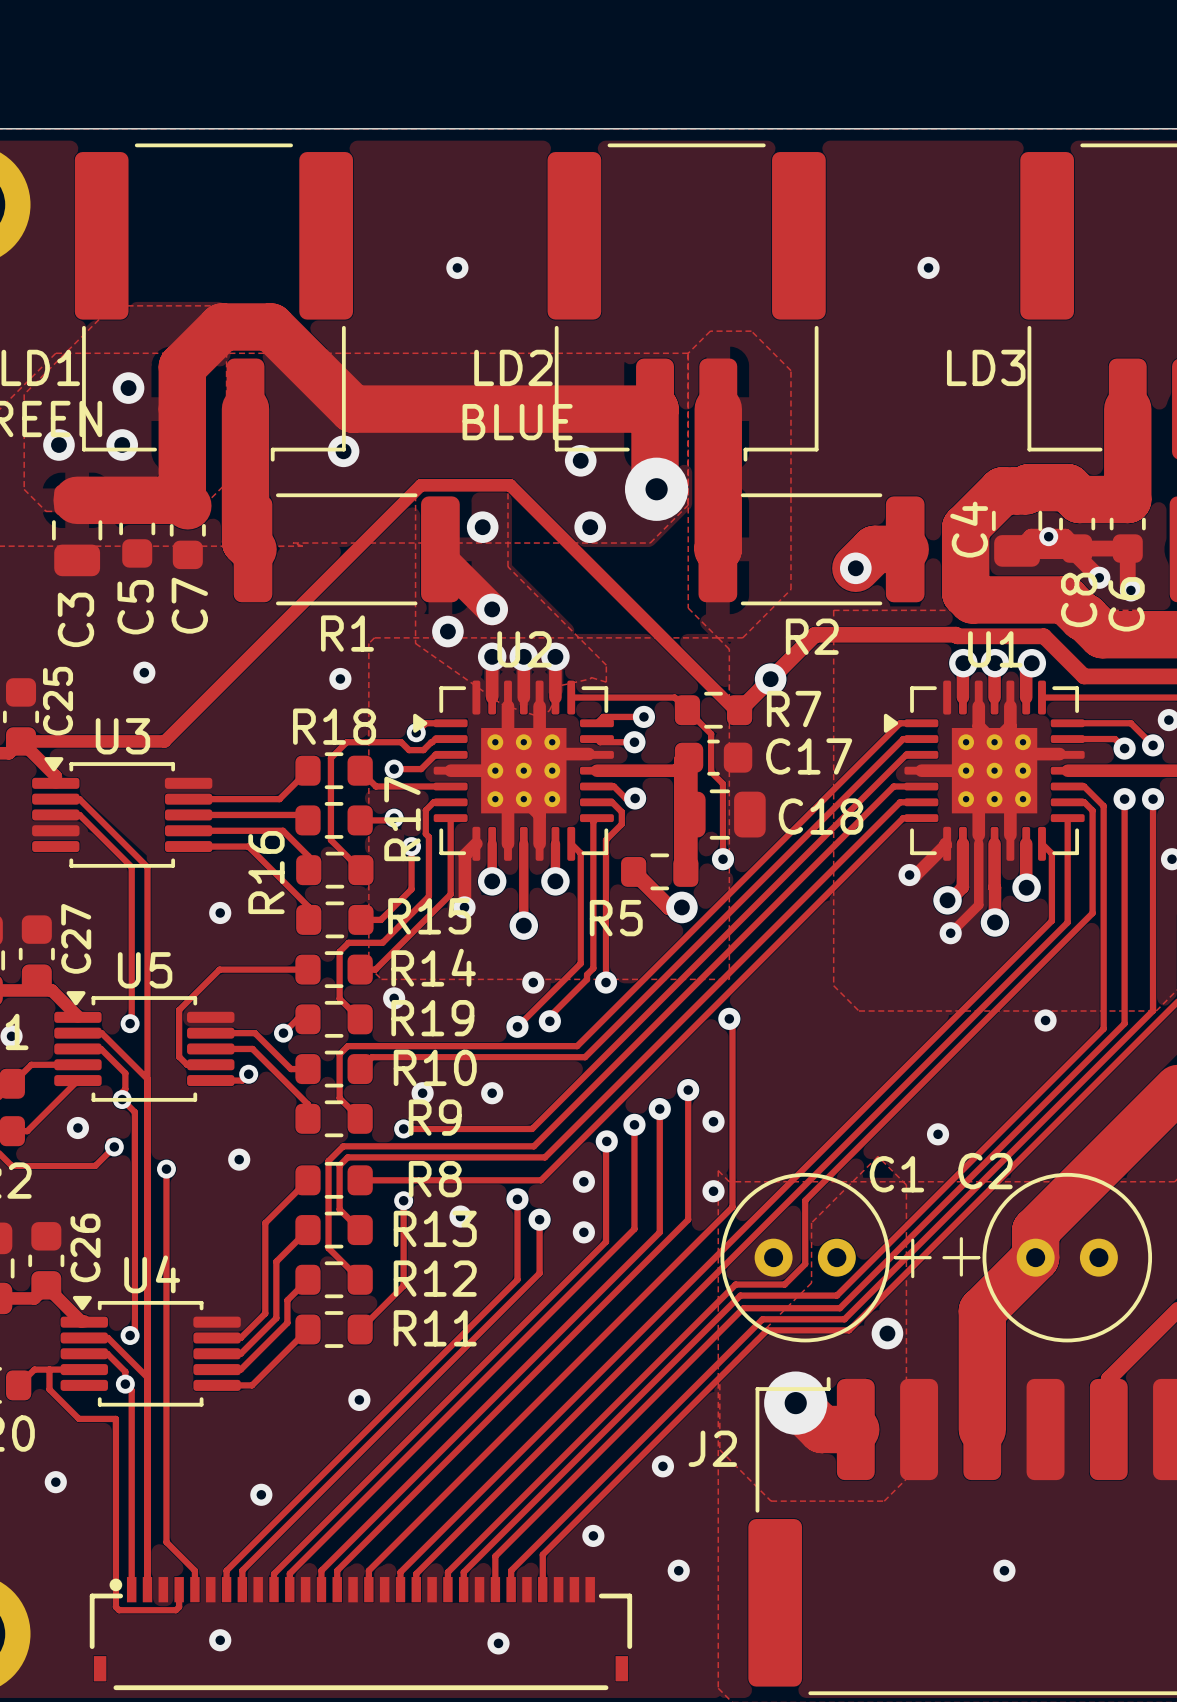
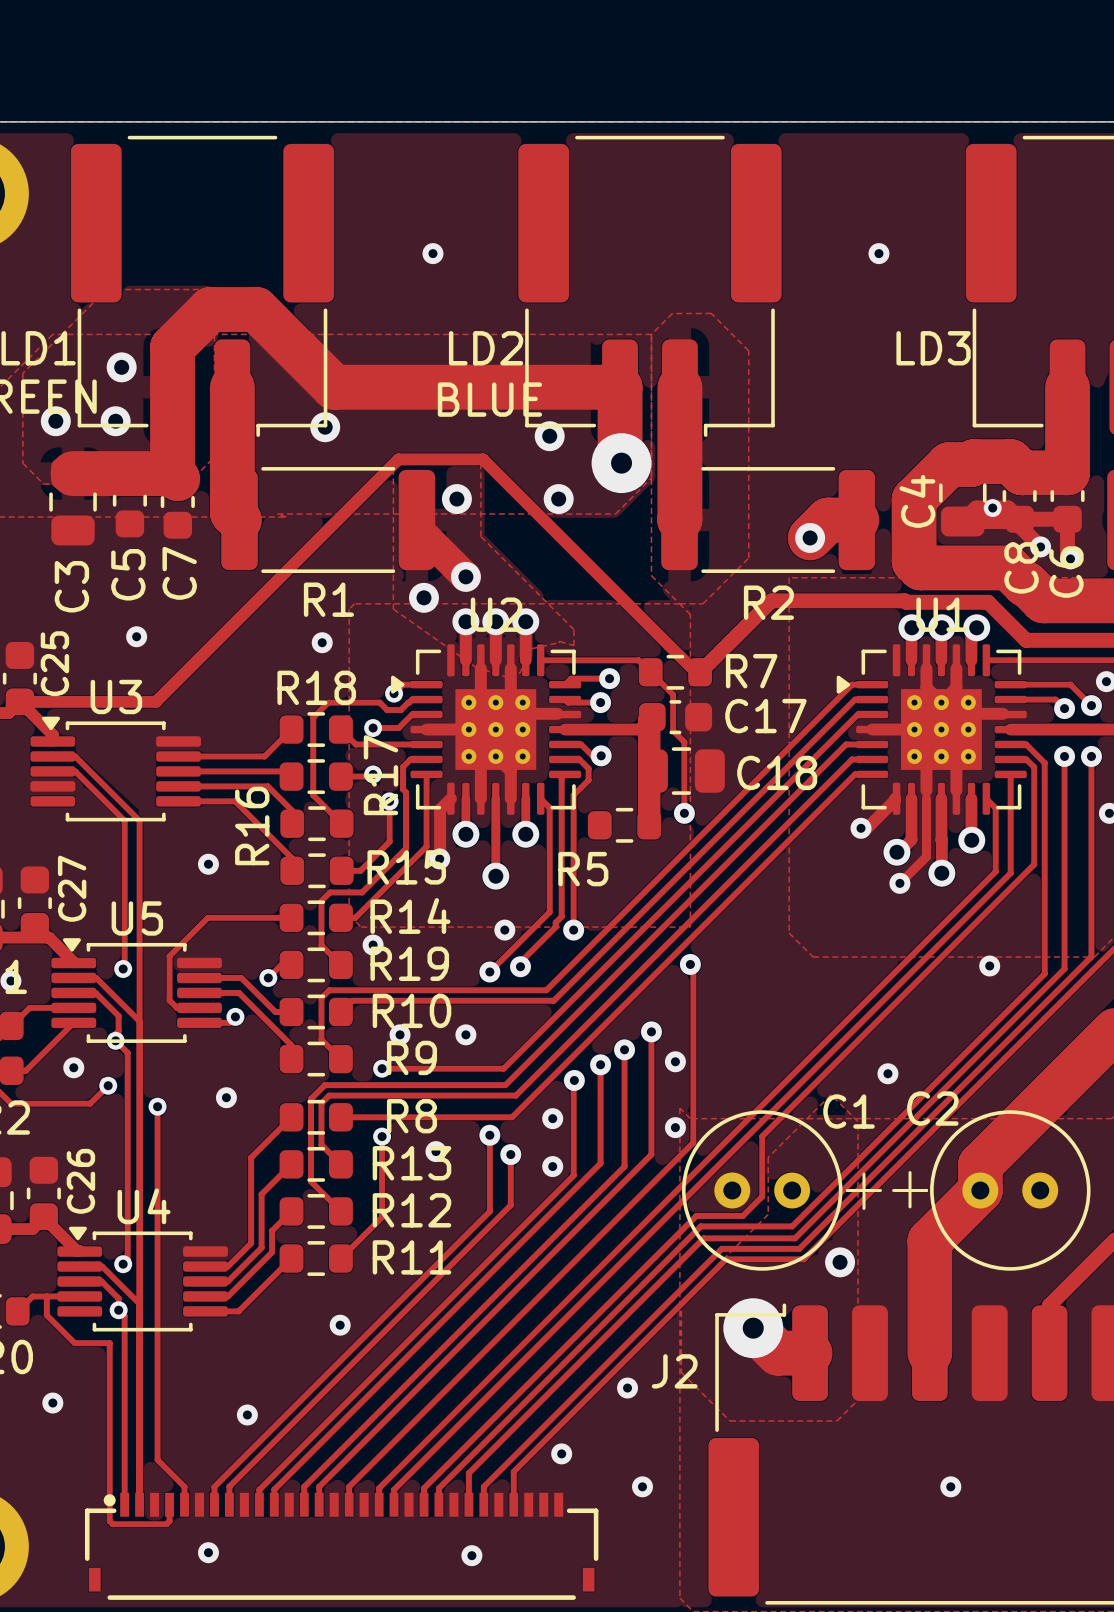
via: (770, 679) -> none
track: (633, 871) (669, 907) (681, 907) -> none
via: (681, 907) -> none

